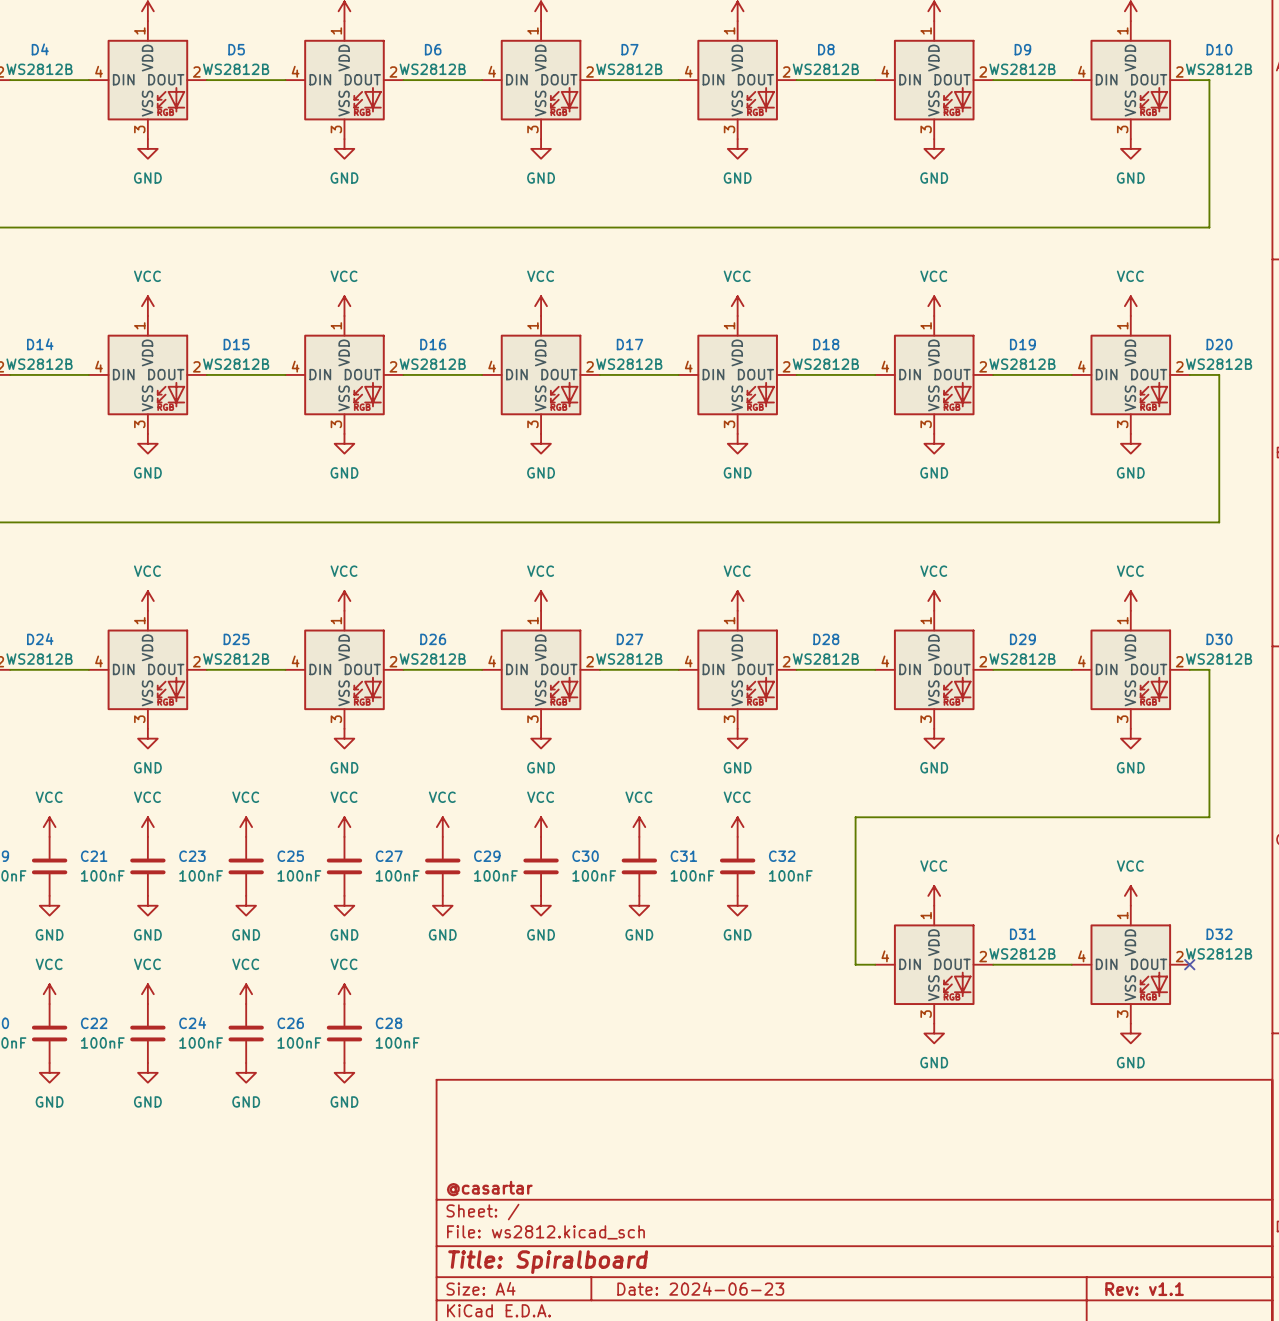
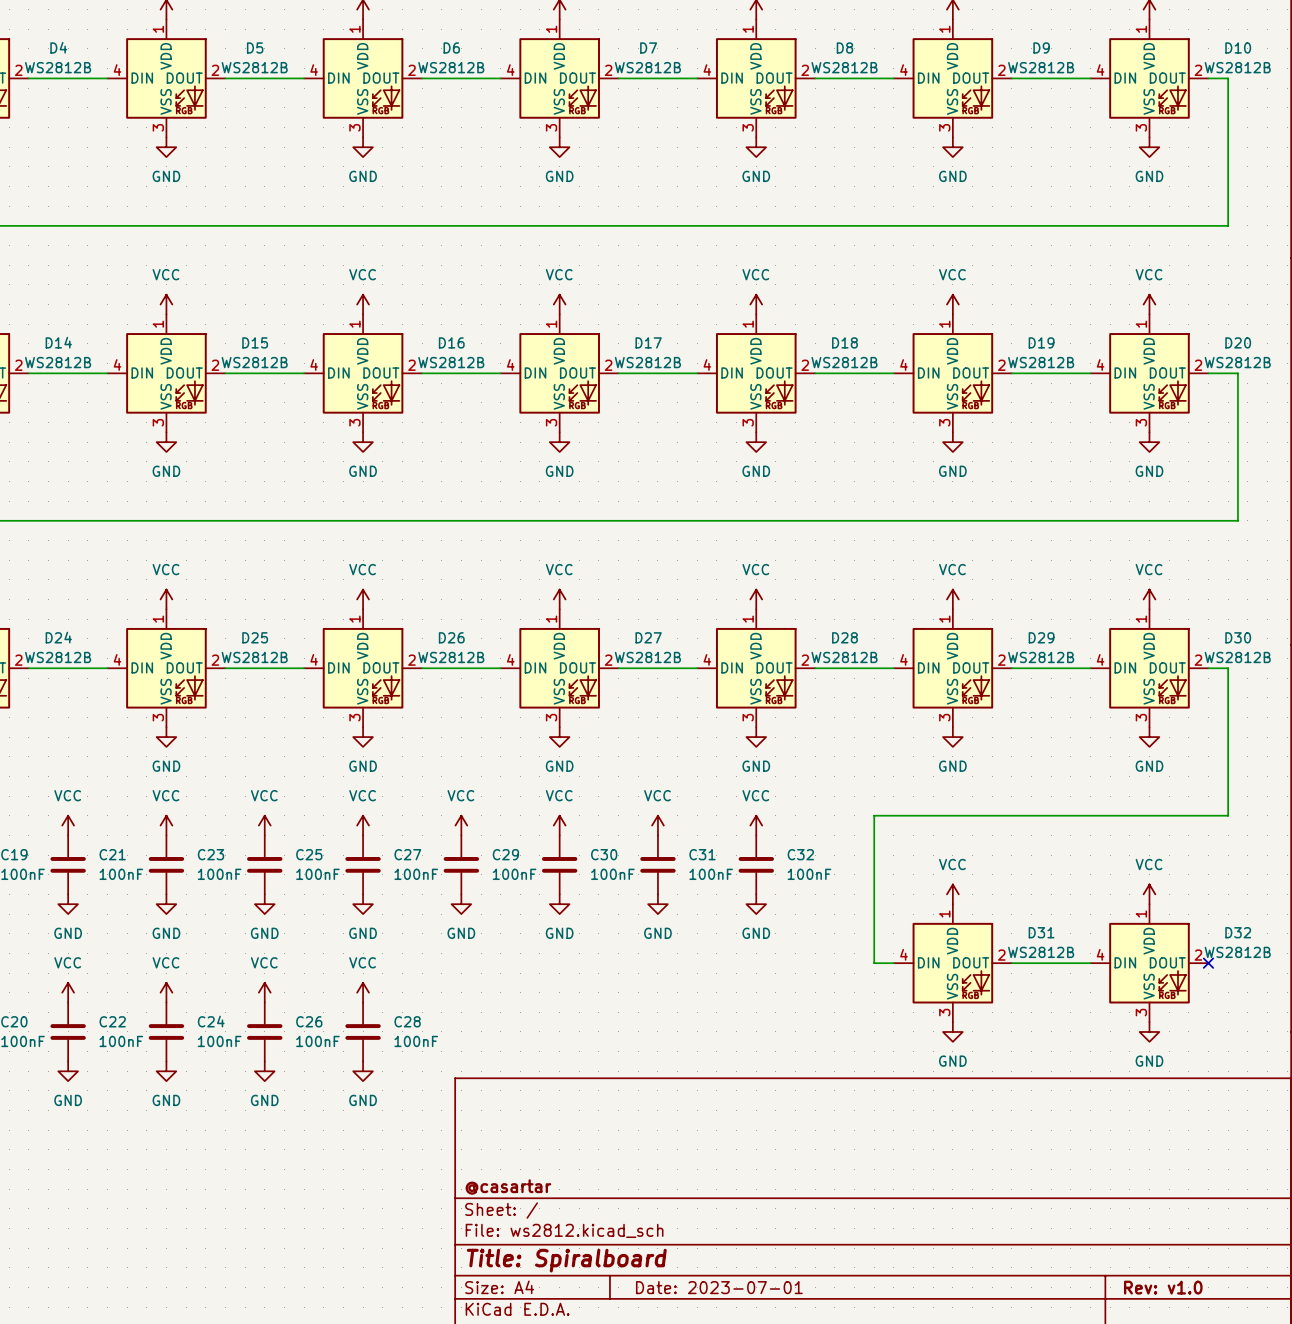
title block: Date: 2024-06-23 (700, 1288) -> Date: 2023-07-01 (719, 1287)
title block: Rev: v1.1 (1144, 1289) -> Rev: v1.0 (1163, 1287)

